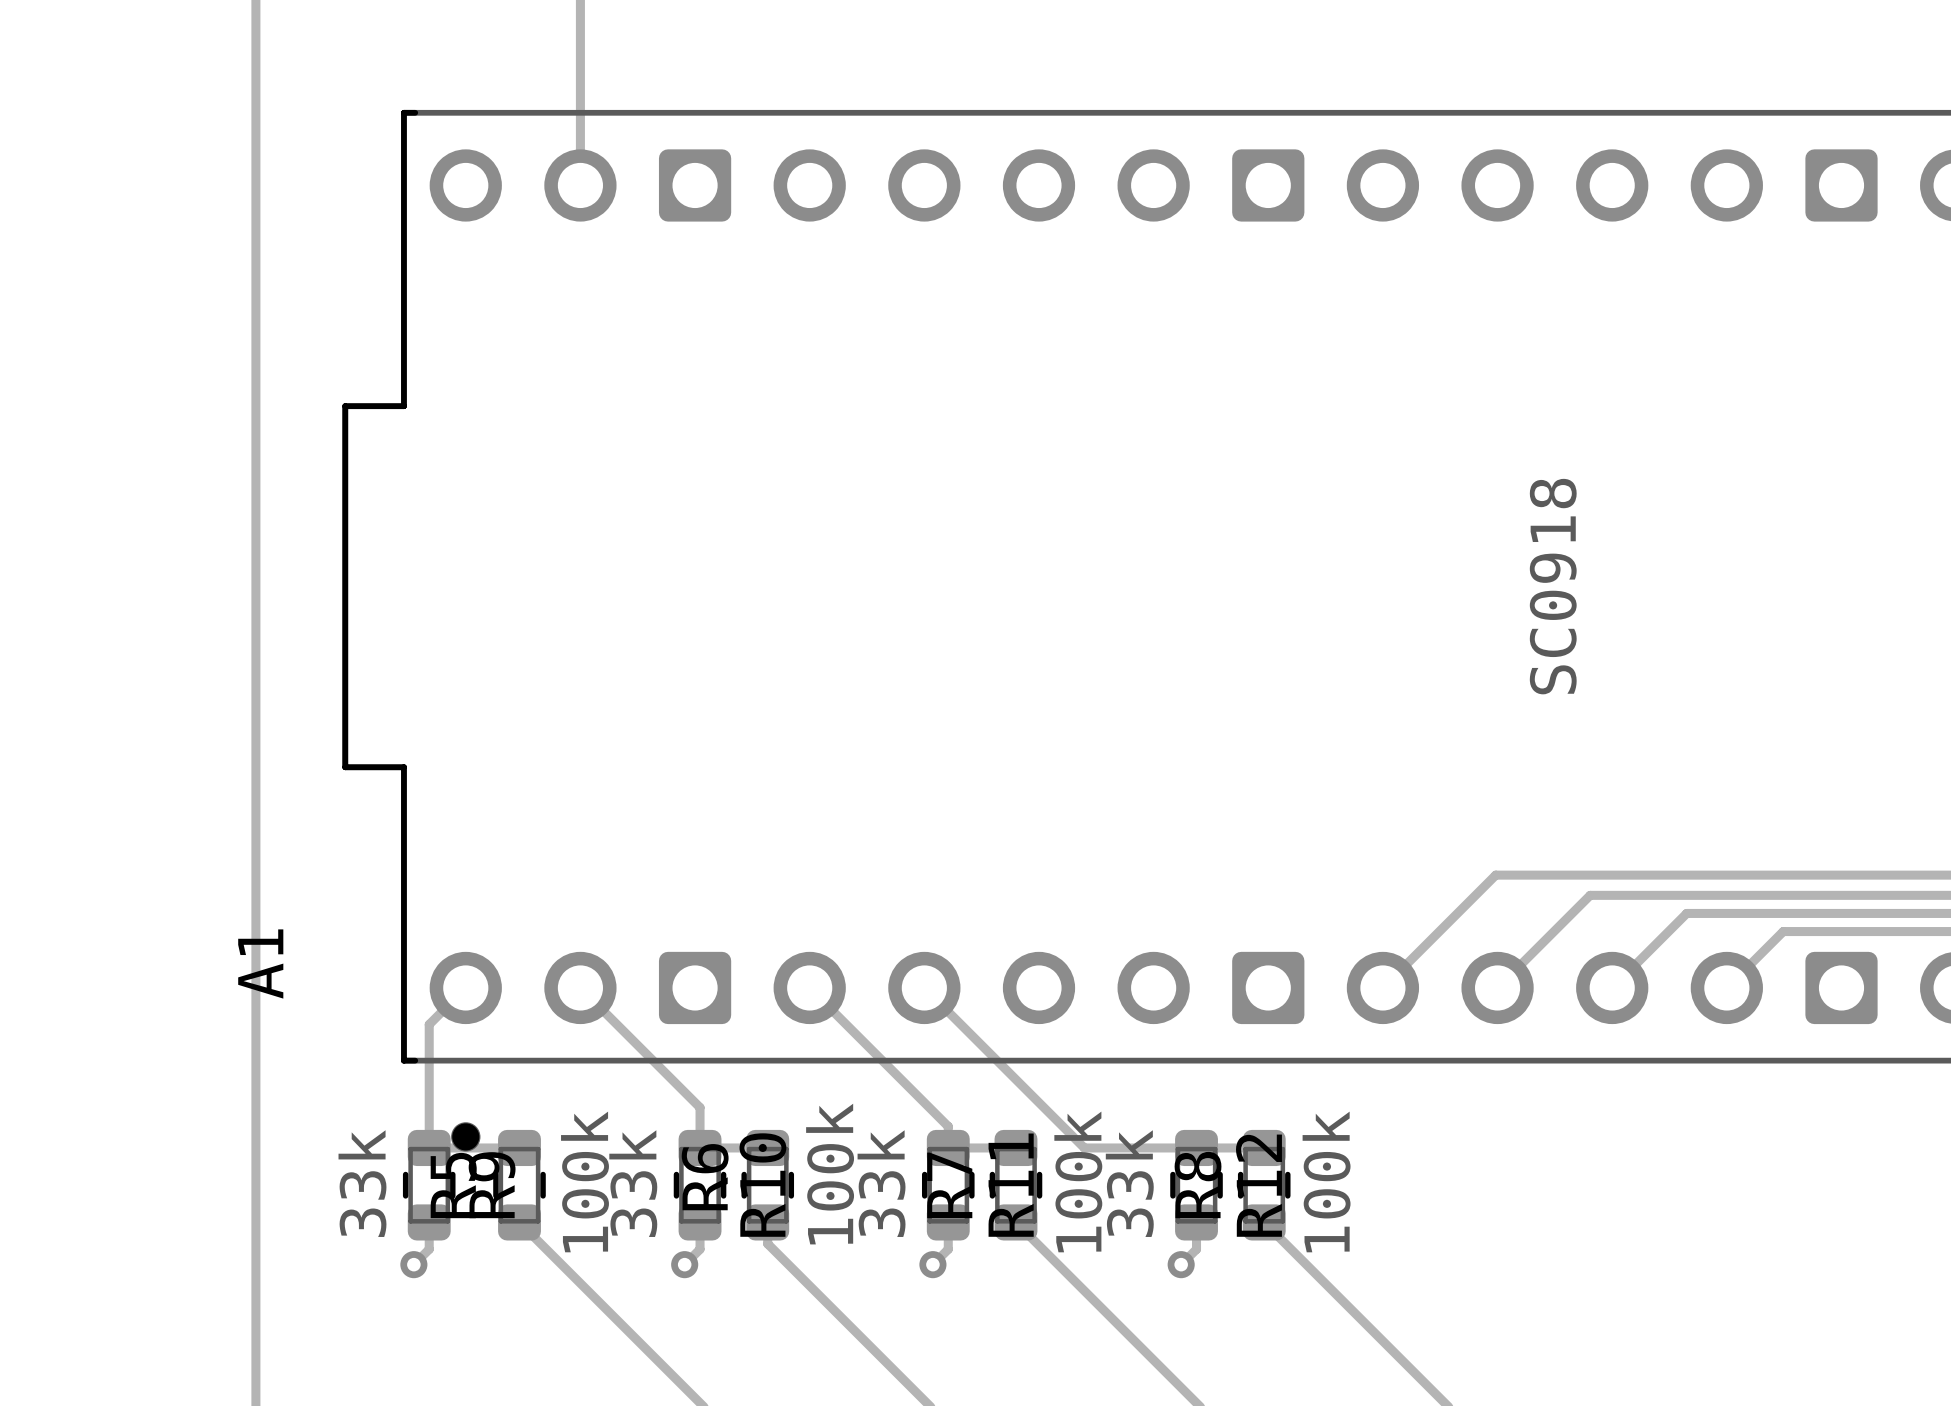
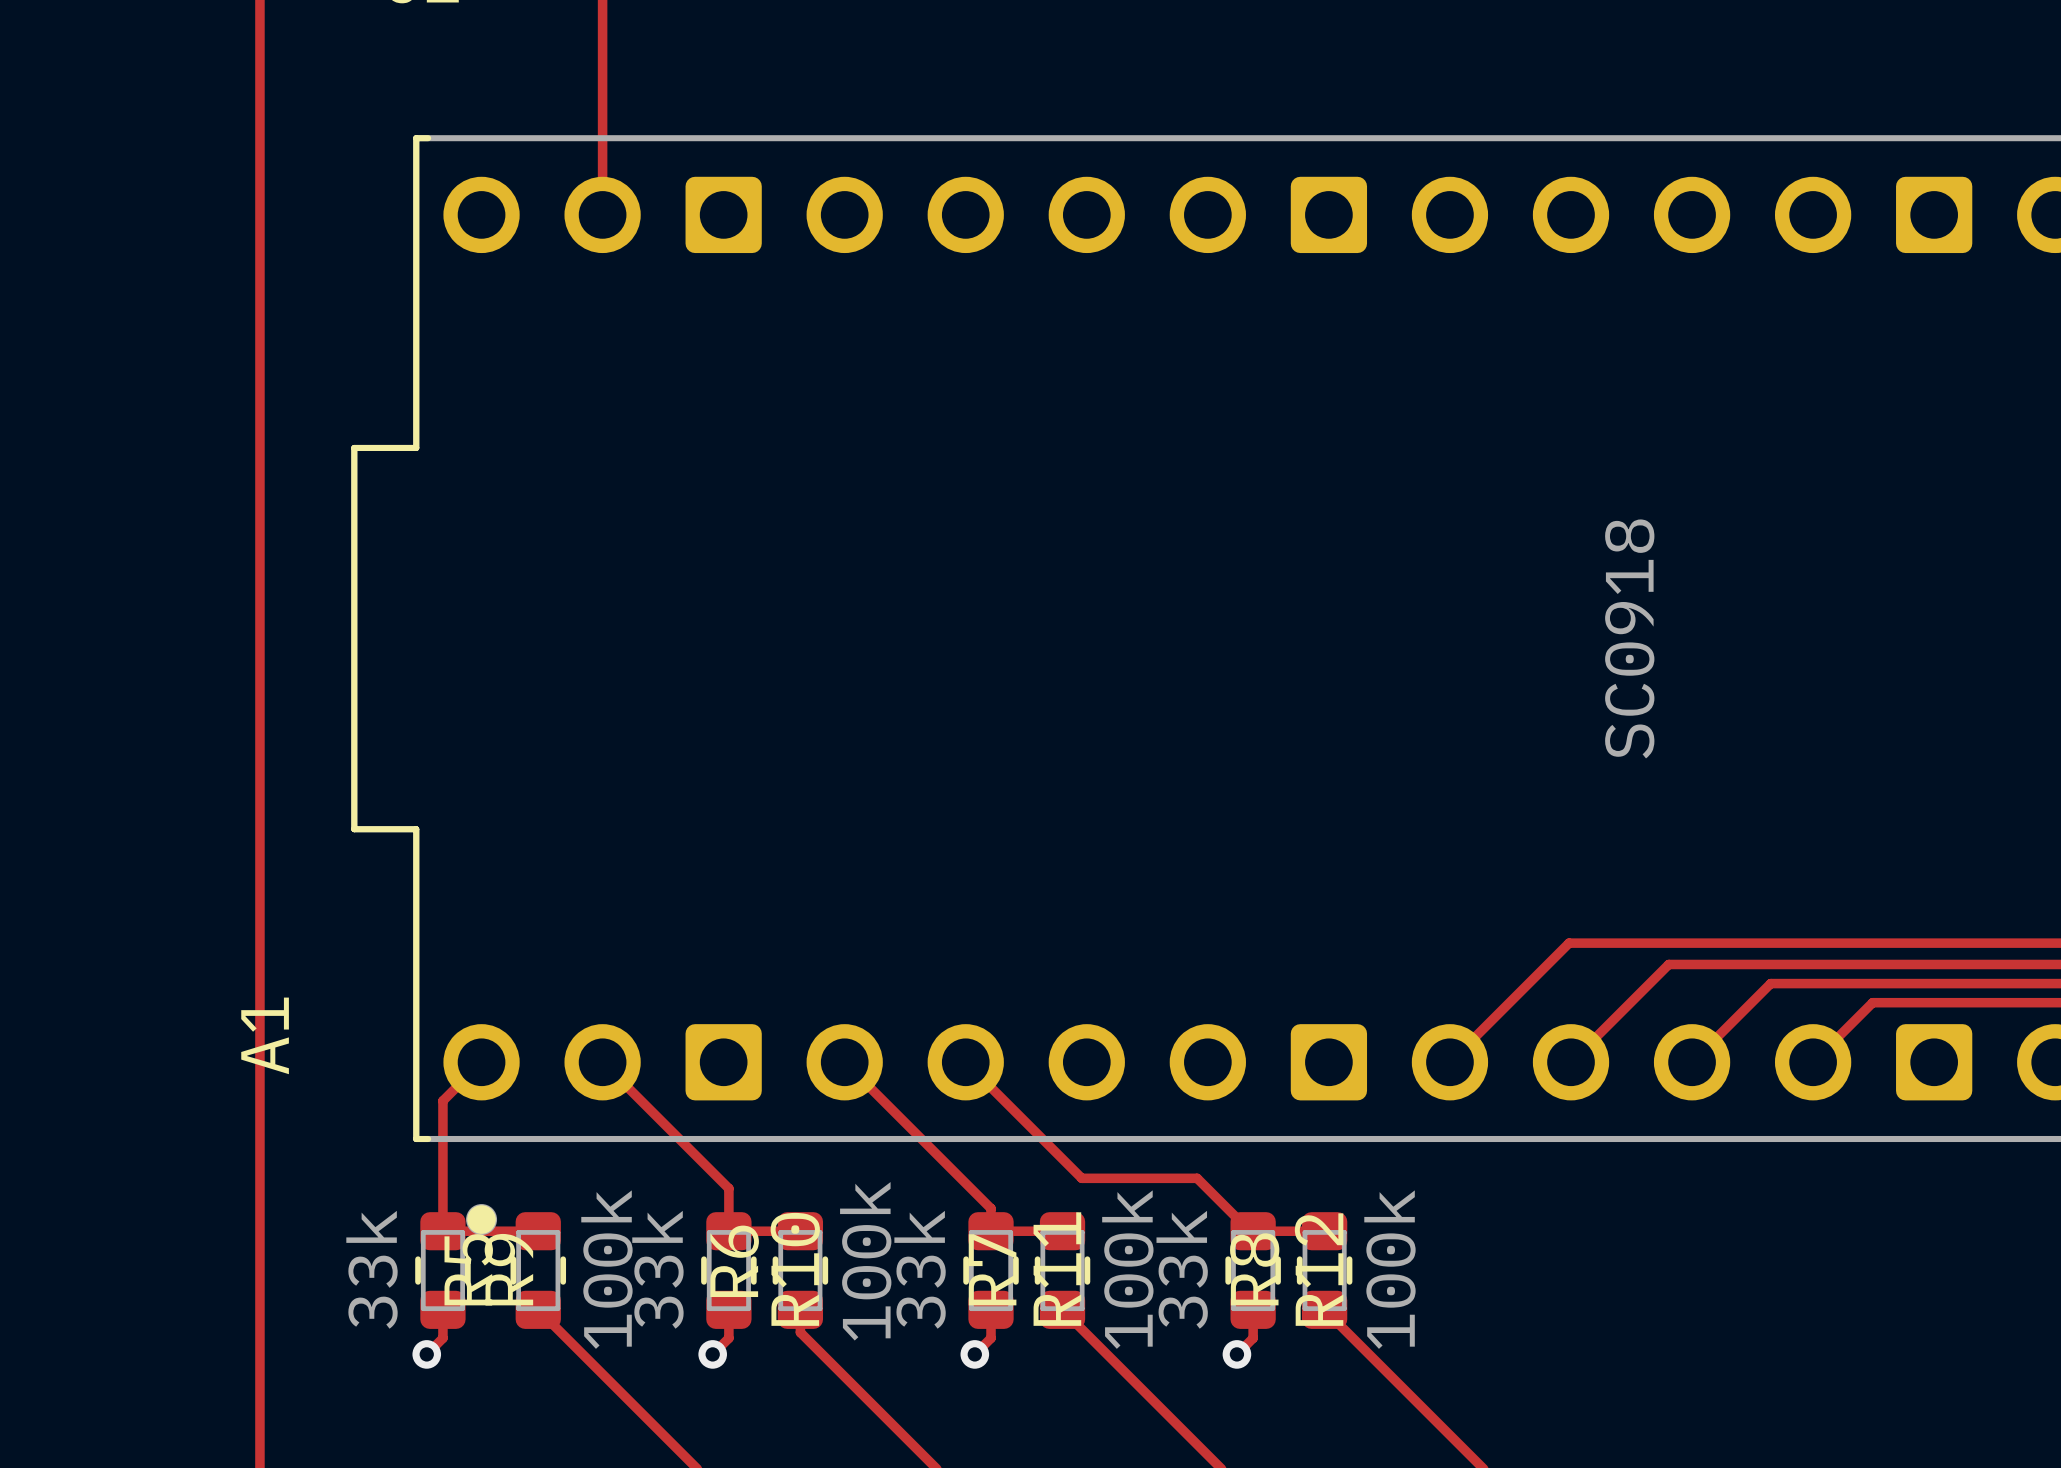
track: (1034, 1097) (1084, 1147) (1193, 1147) -> (1081, 1178) (1197, 1178) (1250, 1231)

